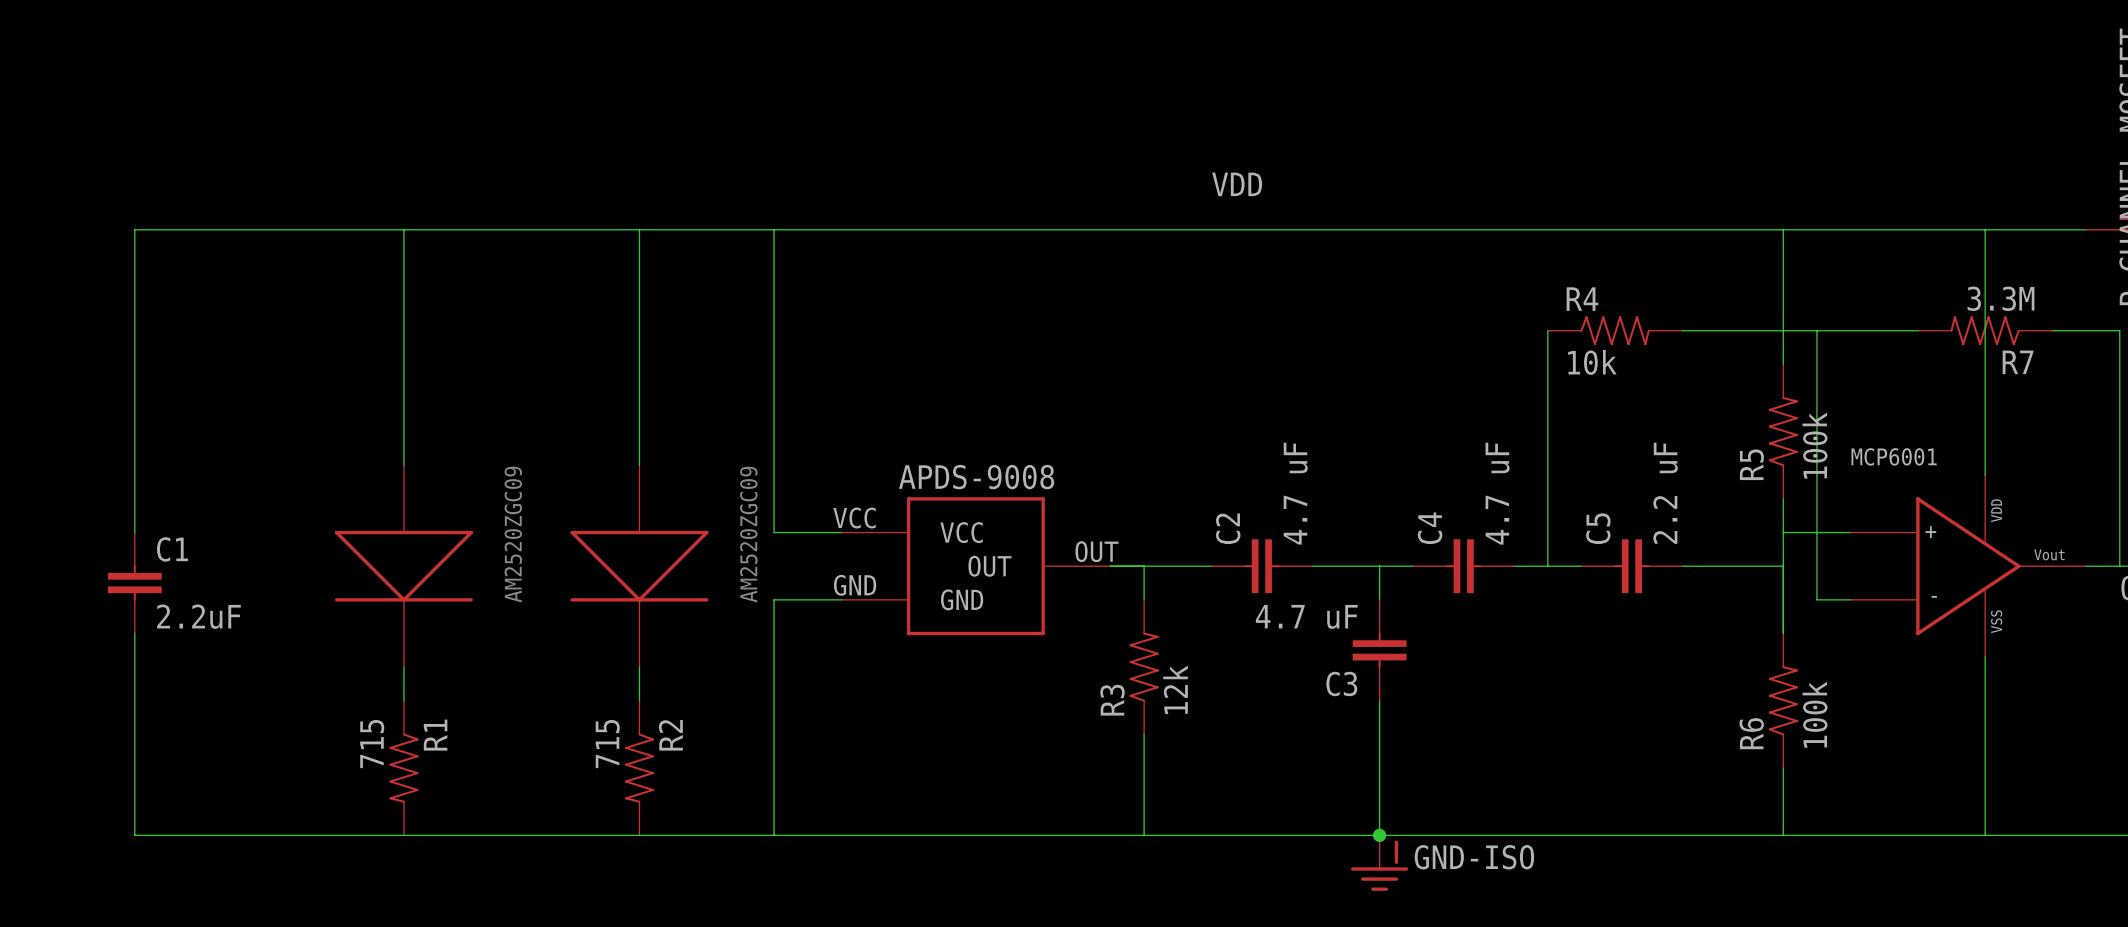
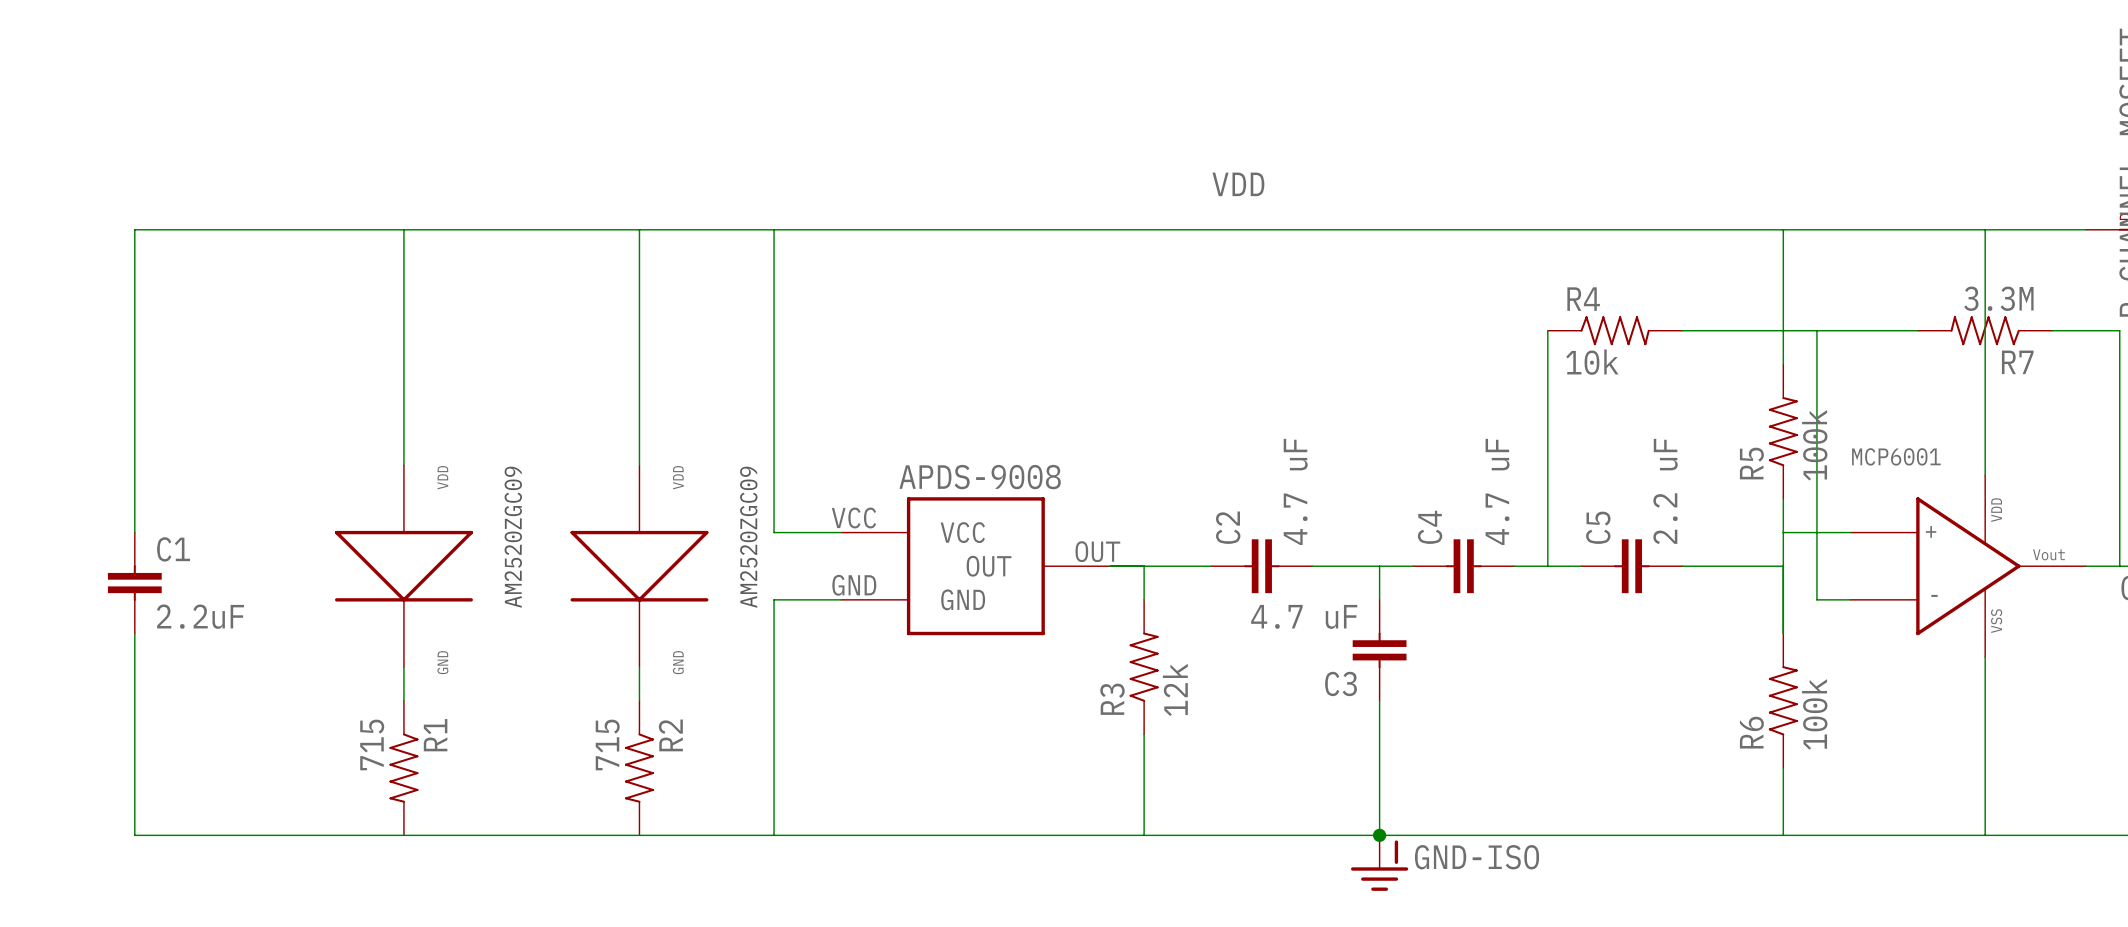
part text: none -> VDD (442, 477)
part text: none -> VDD (678, 477)
part text: none -> GND (442, 662)
part text: none -> GND (678, 662)

